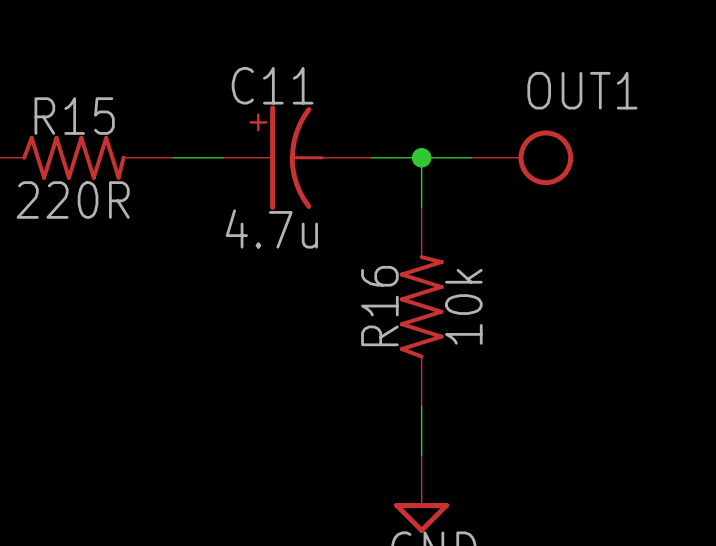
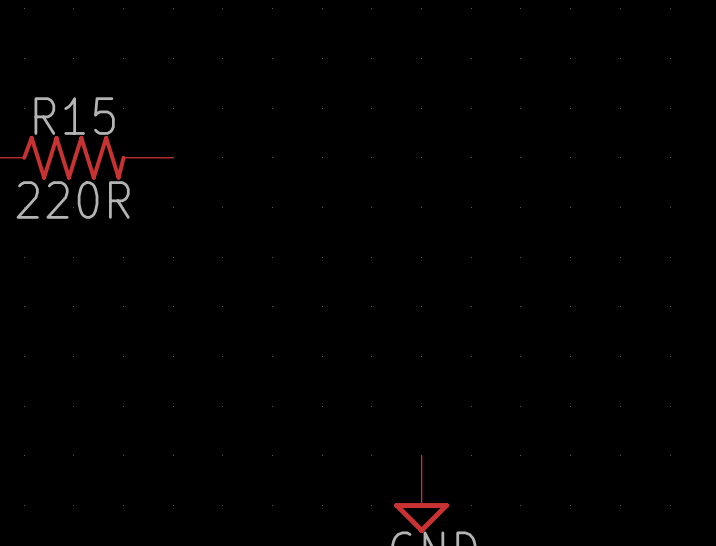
wire: (173, 157) (222, 157) -> none
C11: 4.7u (297, 157) -> none
wire: (371, 157) (471, 157) -> none
wire: (421, 157) (421, 207) -> none
junction: (421, 157) -> none
OUT1: (522, 157) -> none
R16: 10k (421, 306) -> none
wire: (421, 406) (421, 455) -> none

